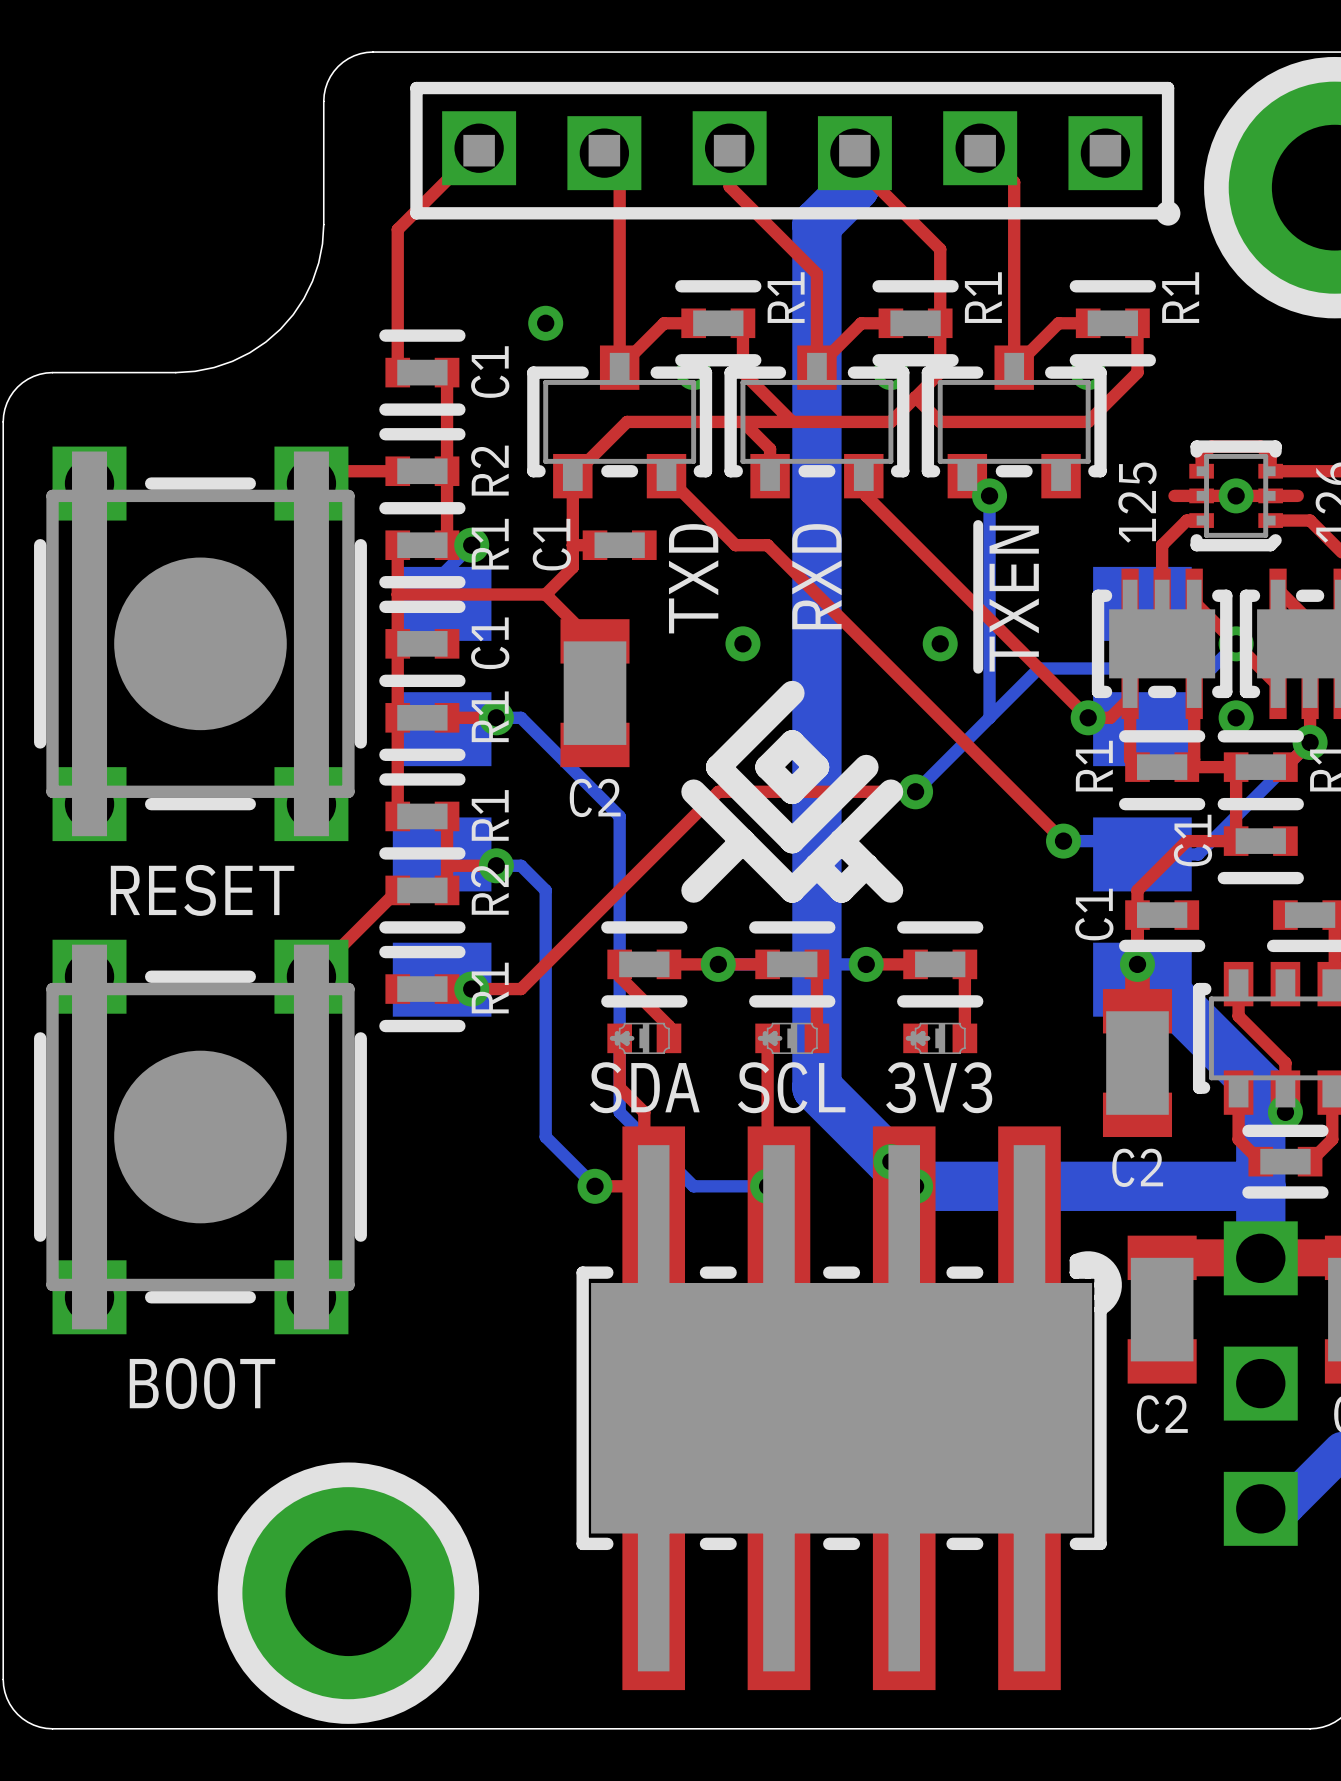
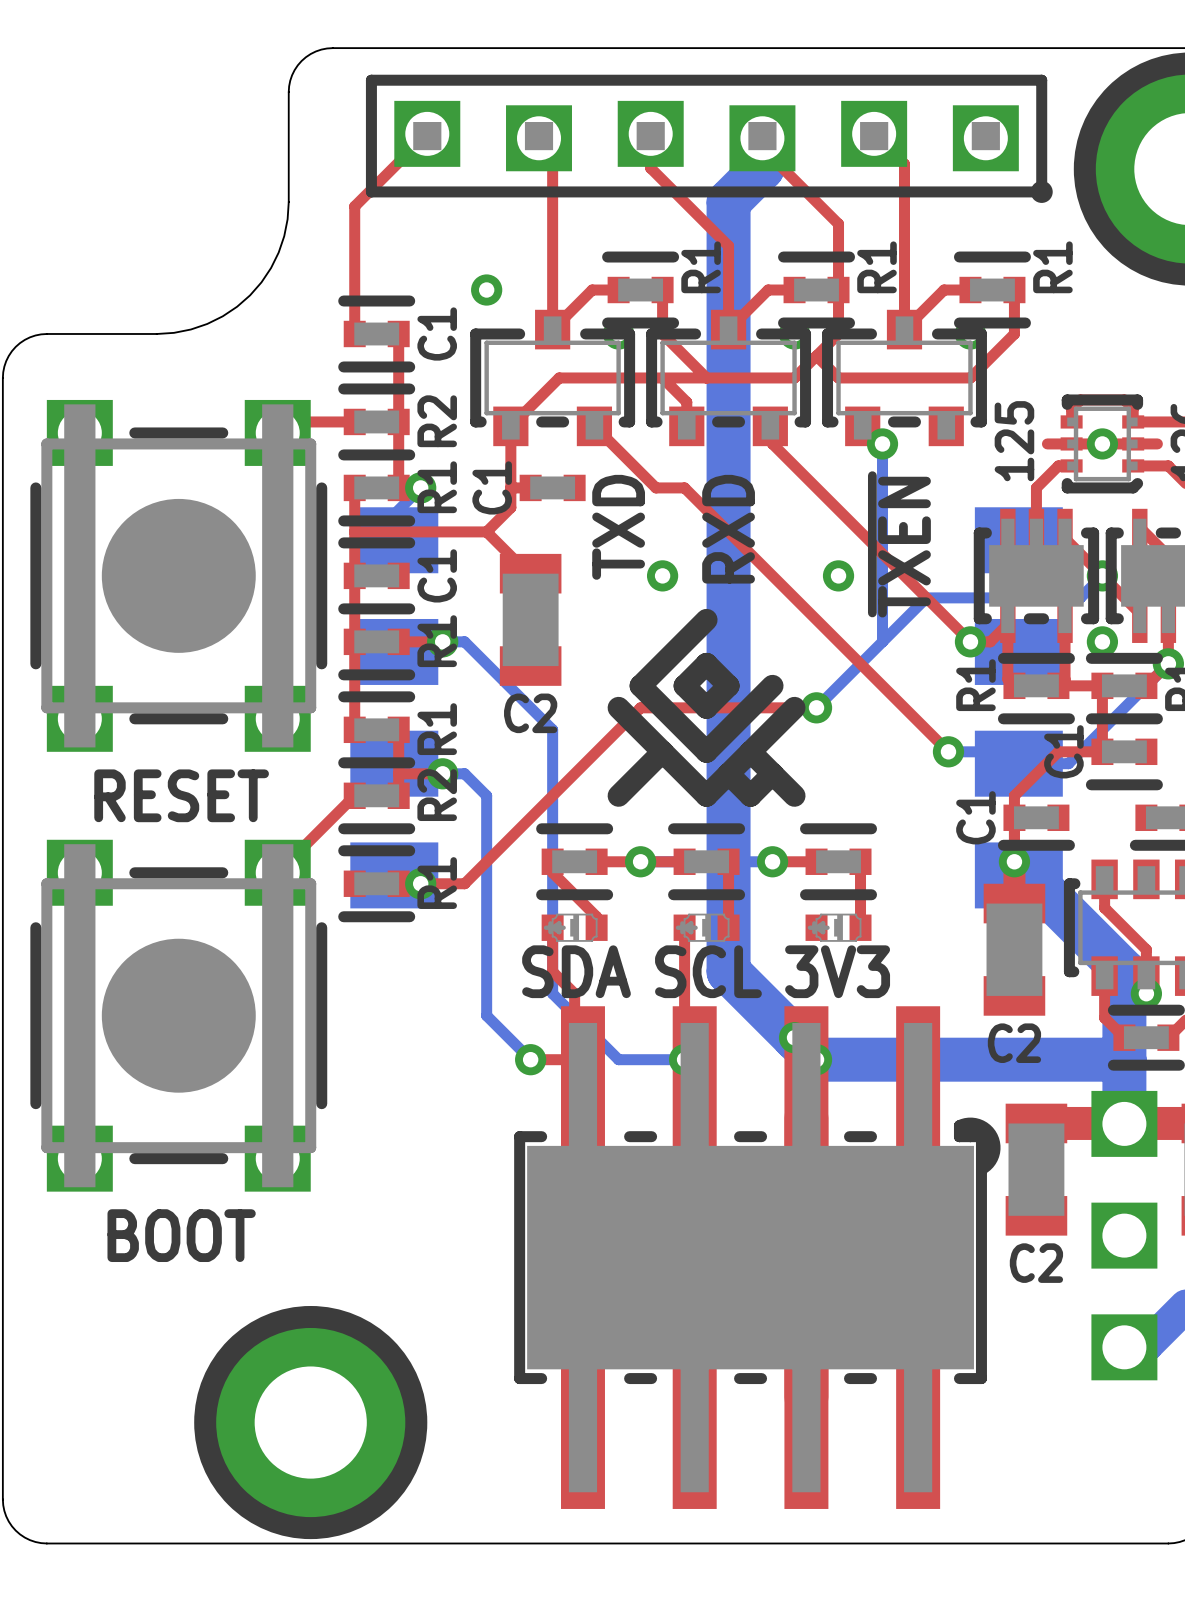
part footprint: [576, 1126, 1122, 1691] -> [514, 1006, 1001, 1509]

